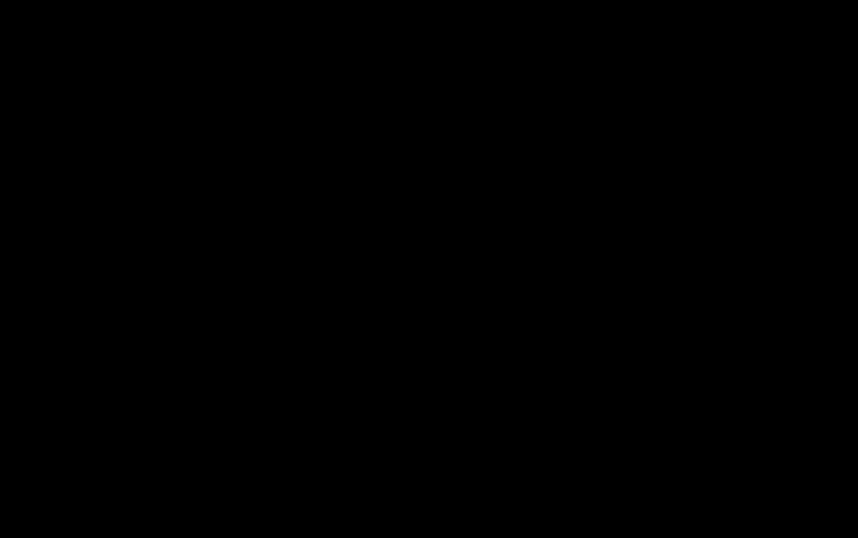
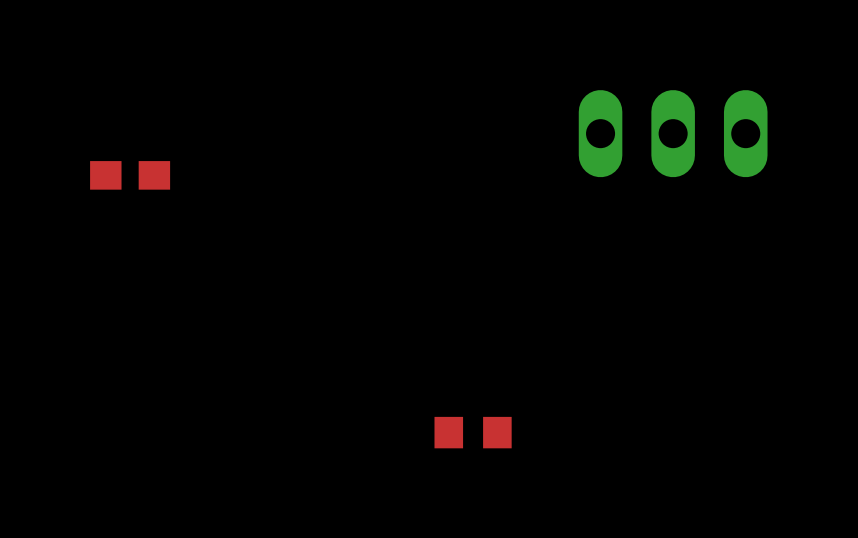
part: none -> (673, 133)
part: none -> (130, 175)
part: none -> (473, 432)

